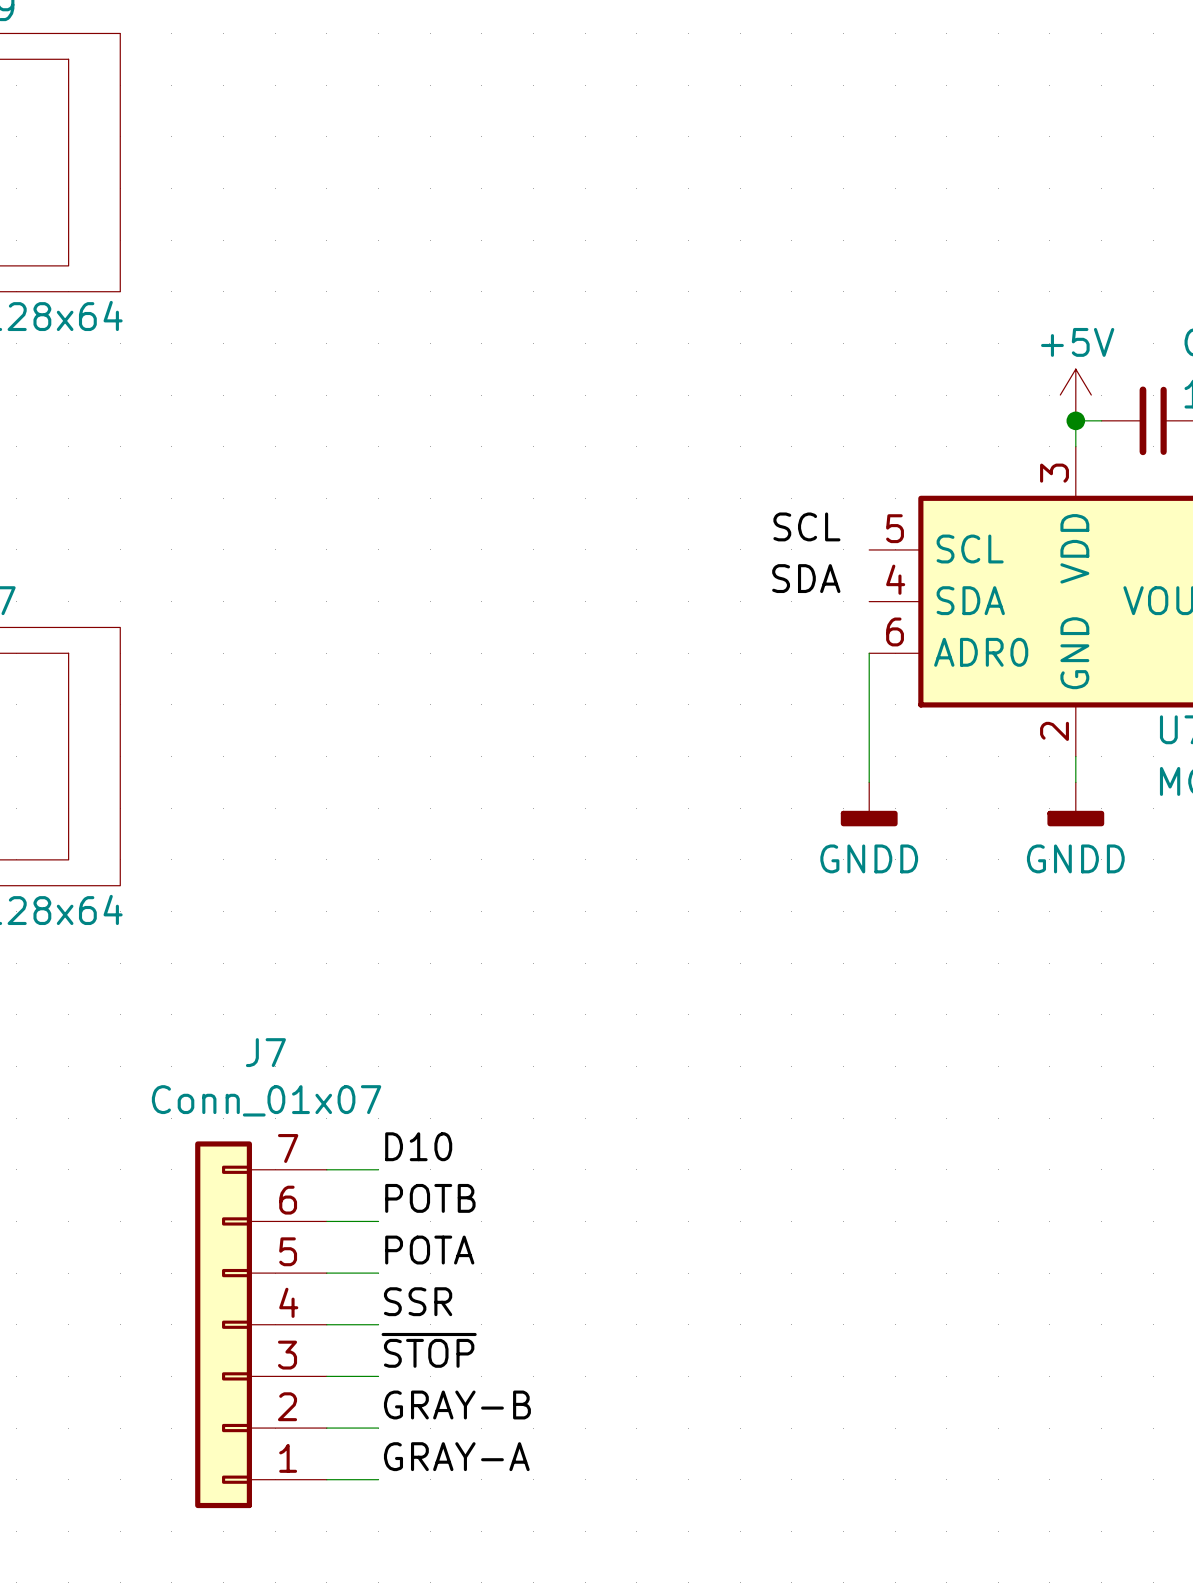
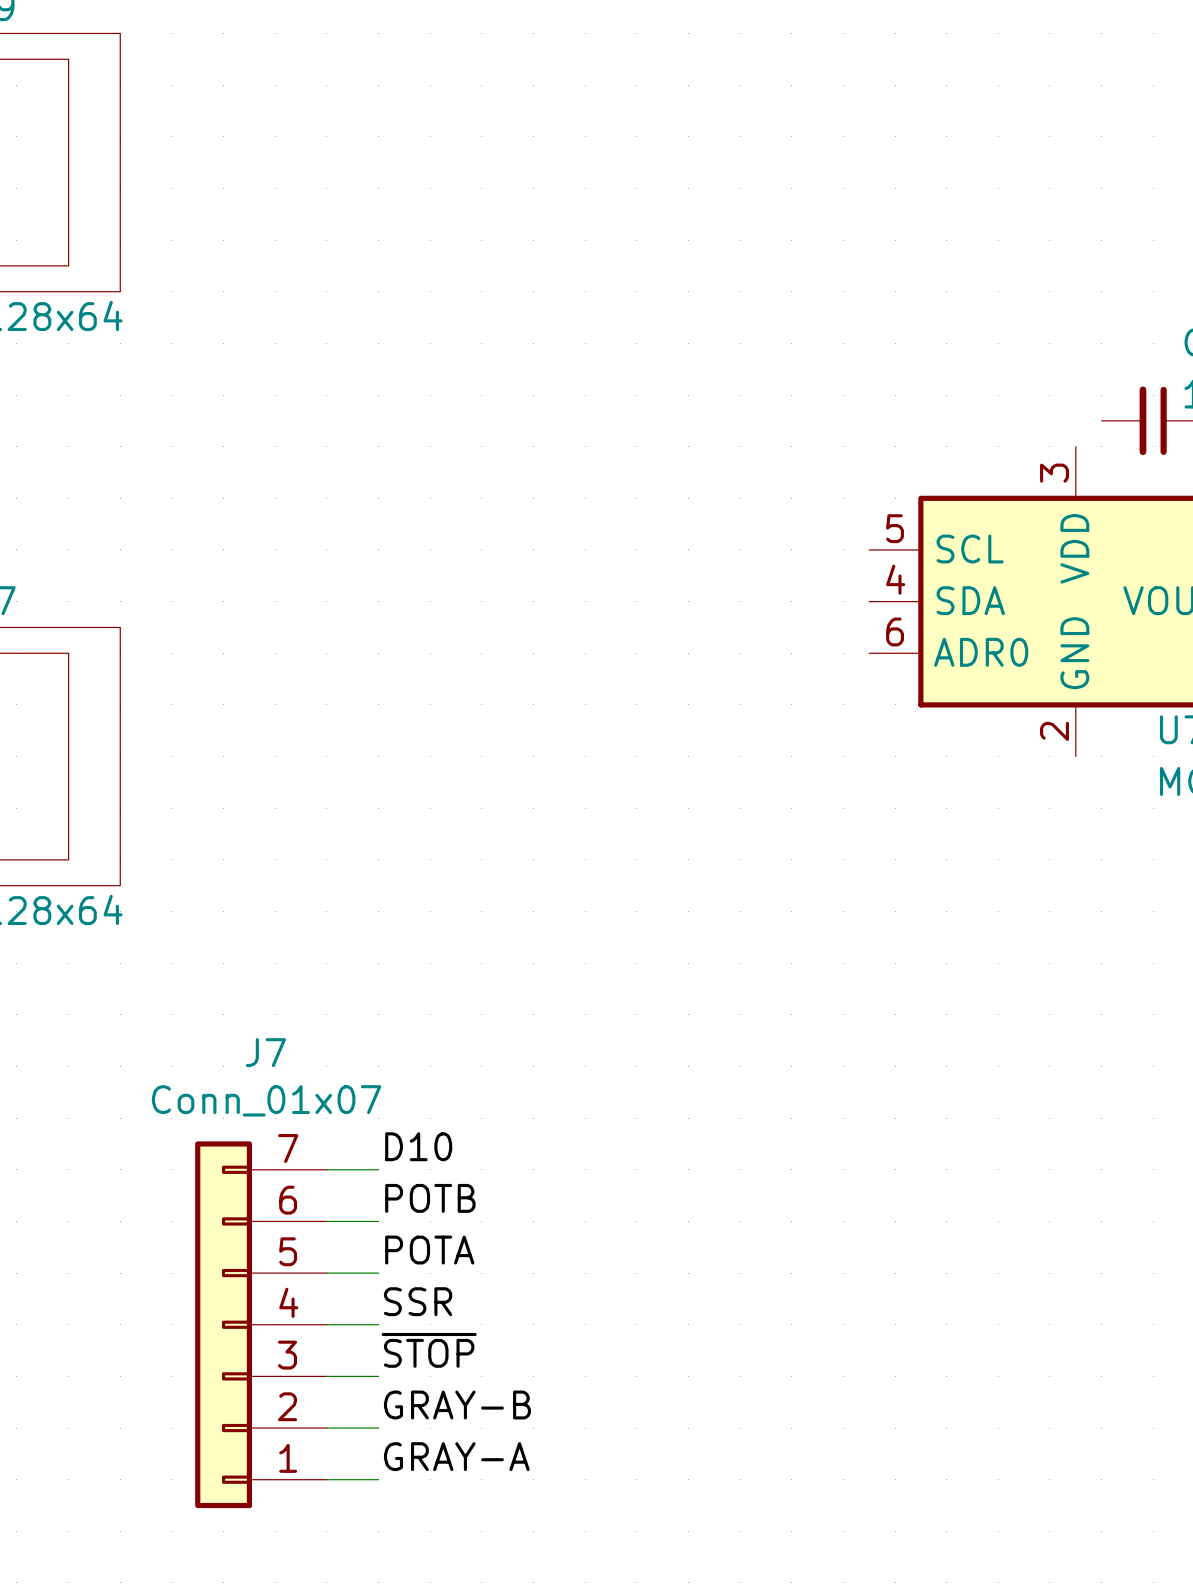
power symbol: +5V (1075, 395) -> none
junction: (1075, 420) -> none
wire: (1101, 420) (1075, 420) (1075, 446) -> none
label: SCL (806, 526) -> none
label: SDA (806, 578) -> none
wire: (869, 653) (869, 782) -> none
wire: (1075, 756) (1075, 782) -> none
power symbol: GNDD (869, 804) -> none
power symbol: GNDD (1075, 804) -> none

